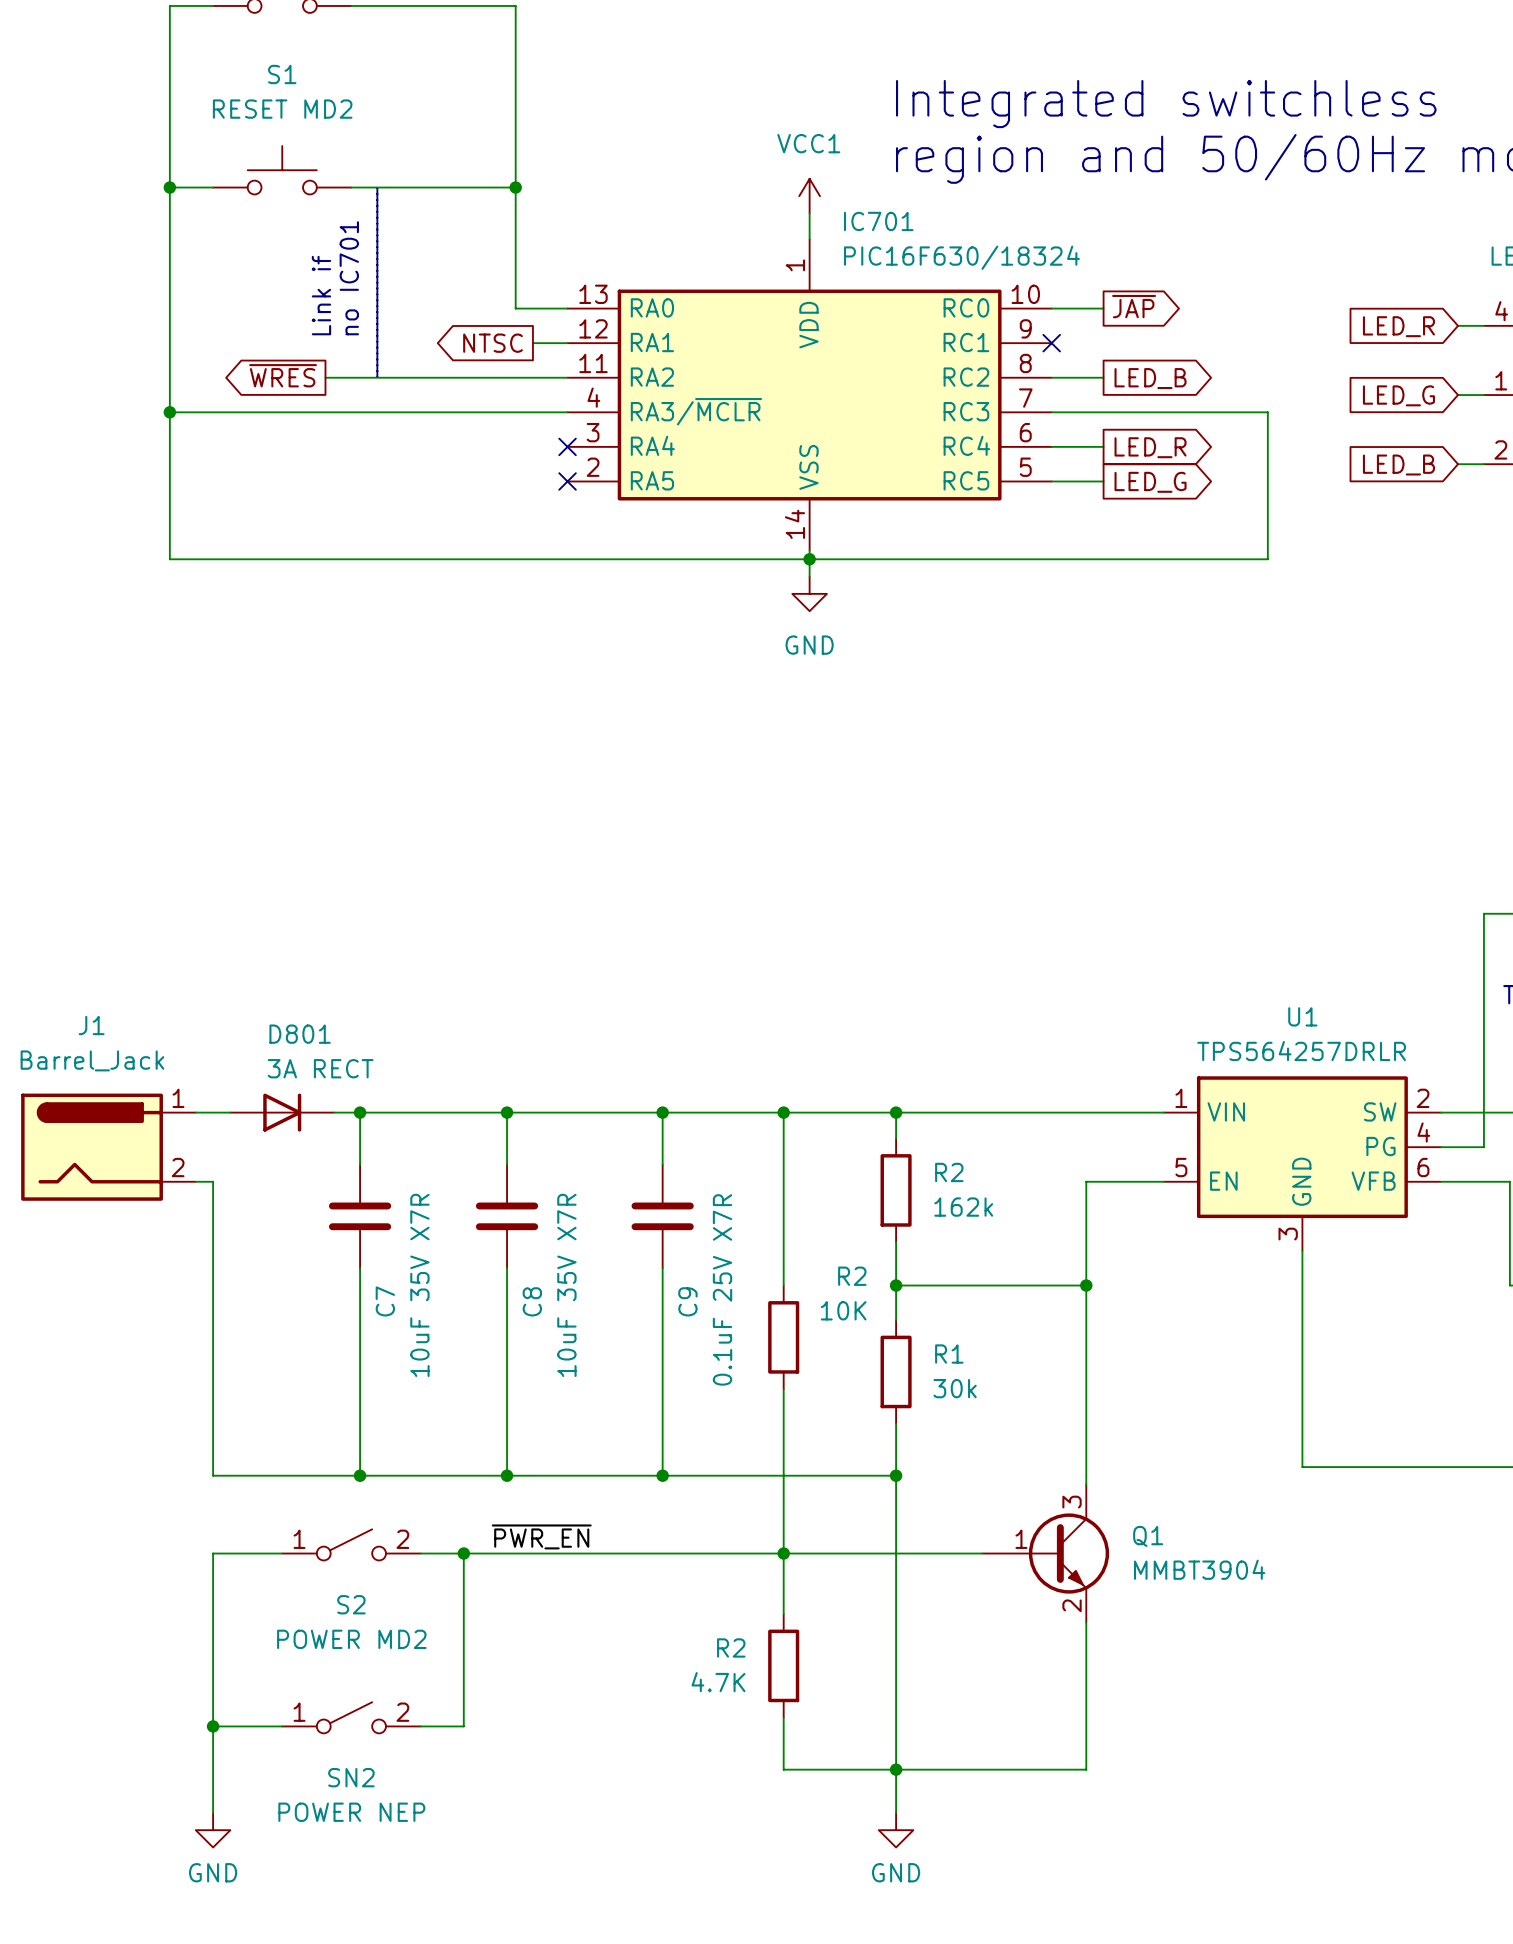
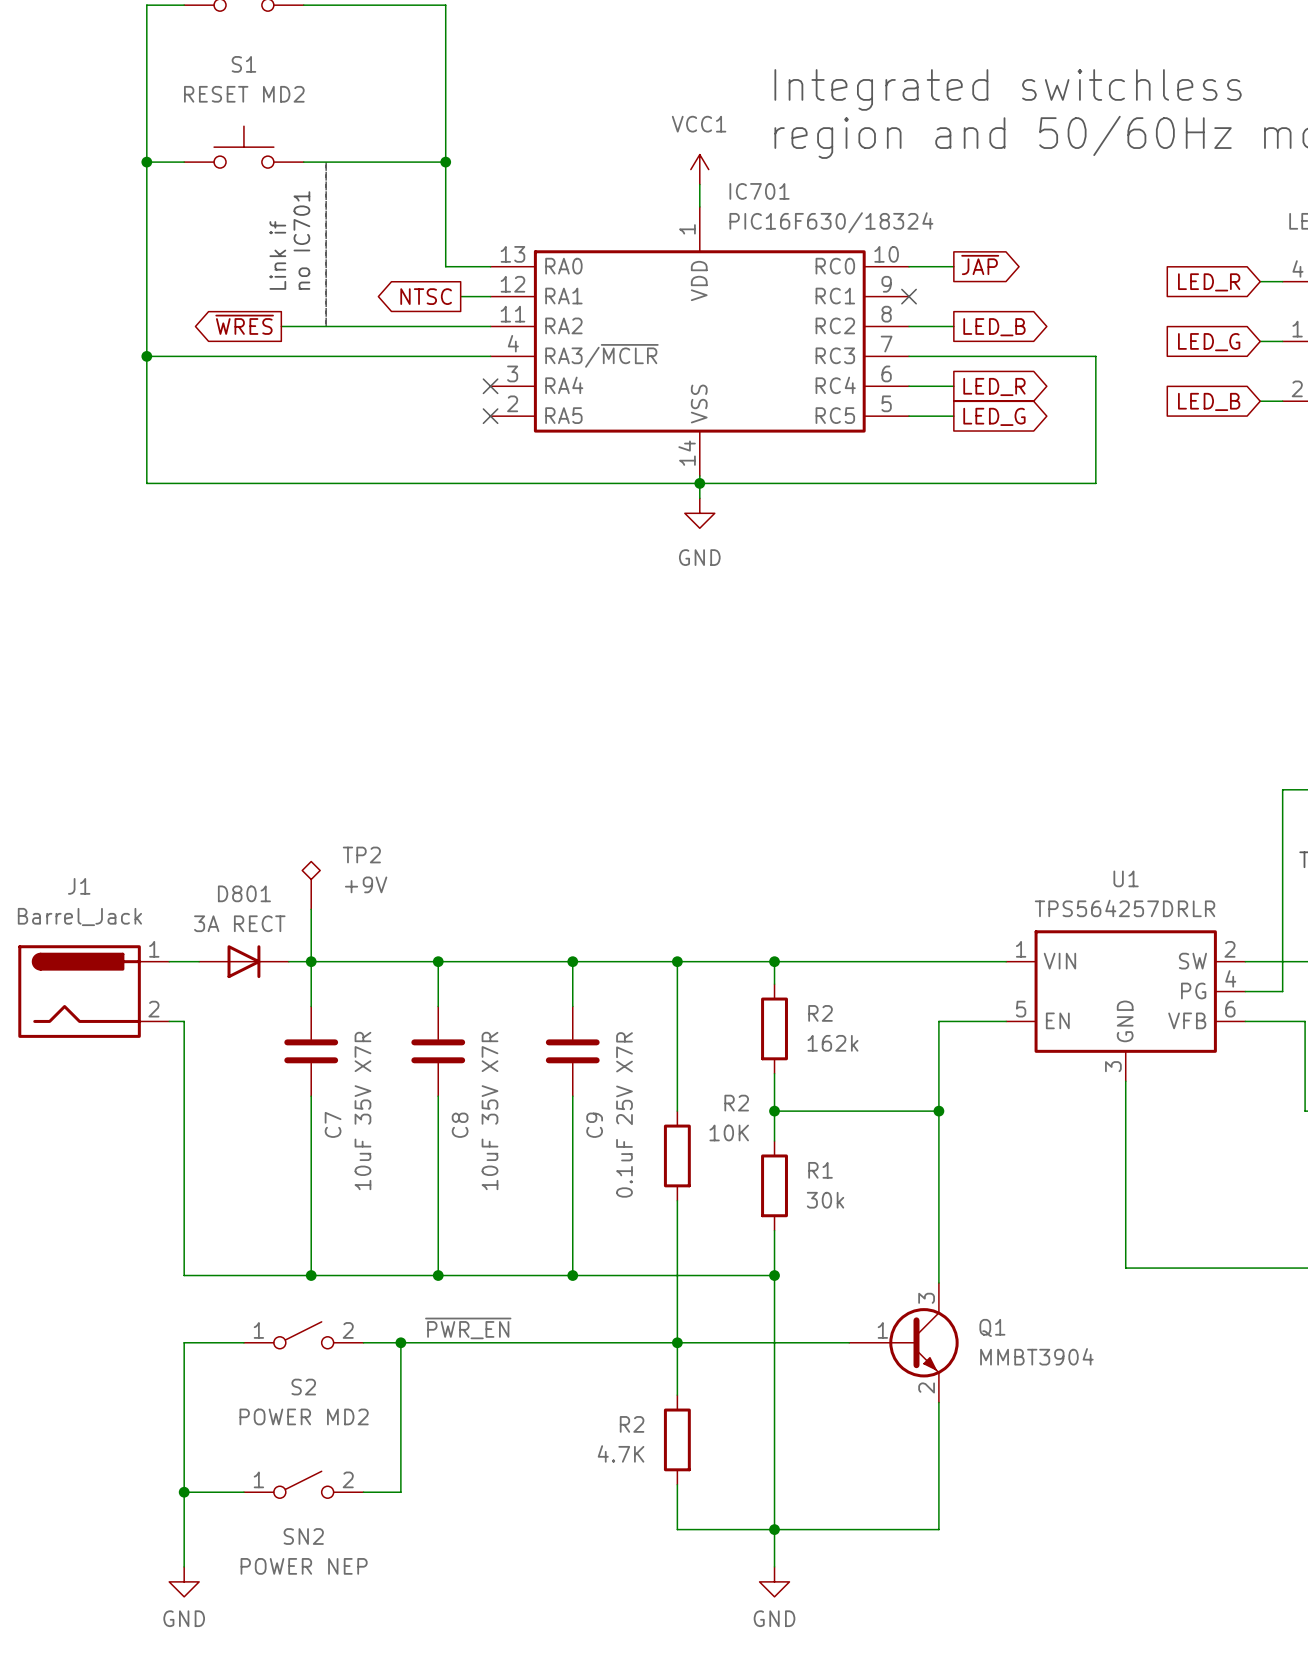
TP2: none -> +9V (311, 885)
D801 name position: D801 (300, 1034) -> D801 (244, 893)
wire: none -> (311, 909) (311, 961)
D801 value position: 3A RECT (320, 1068) -> 3A RECT (239, 923)

